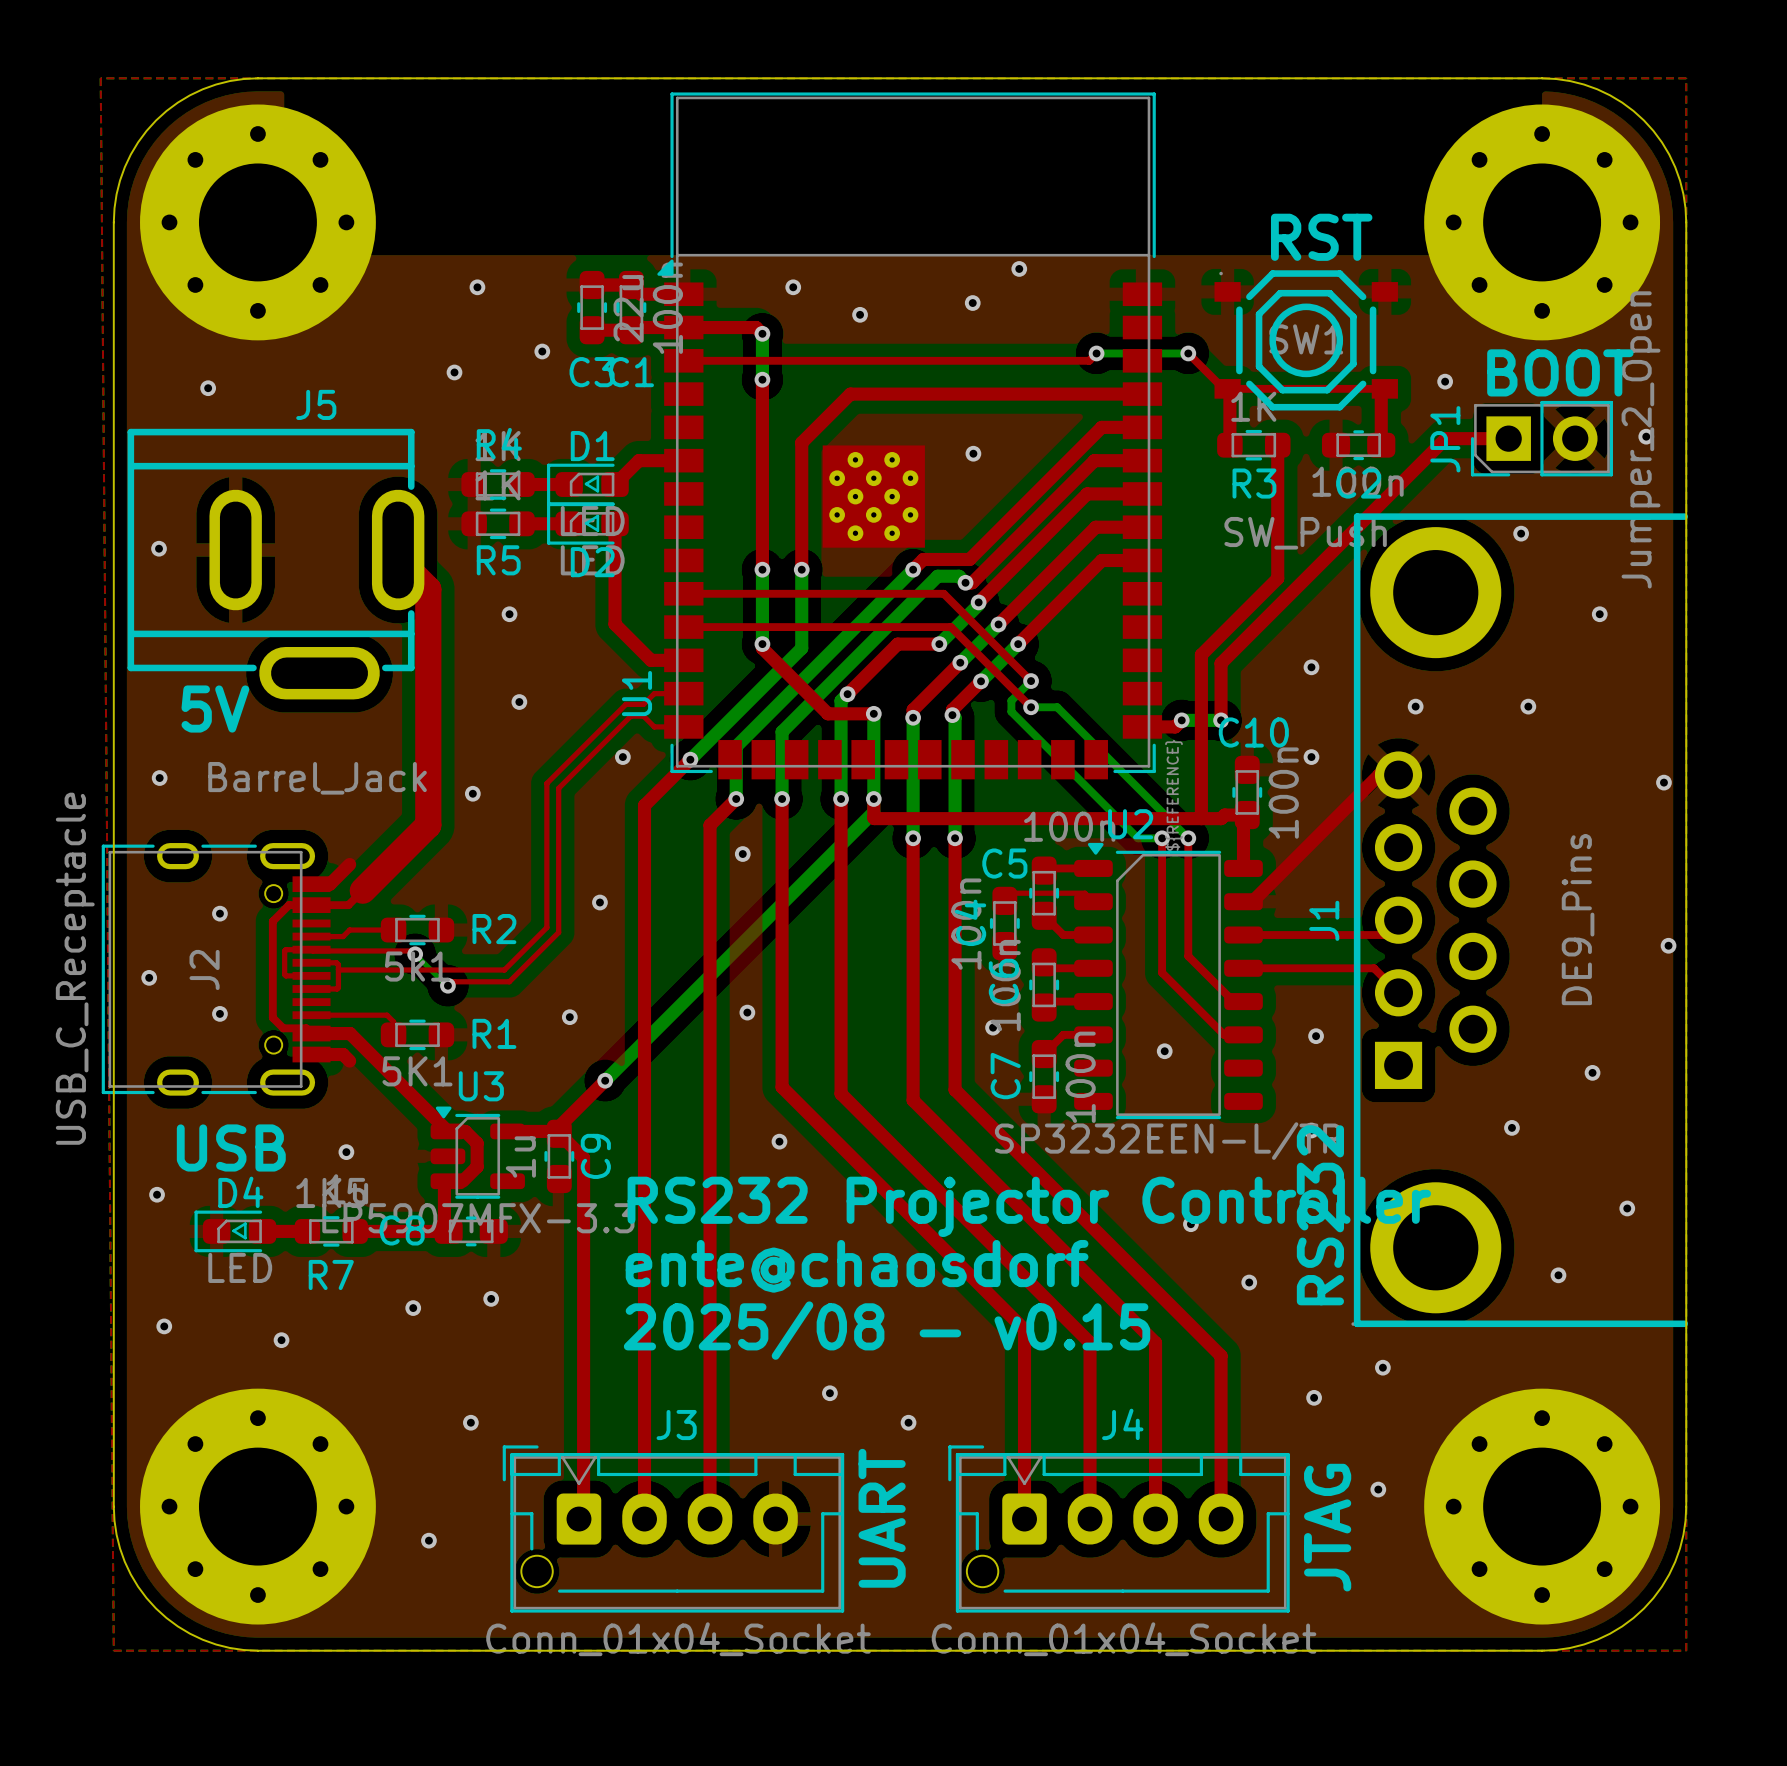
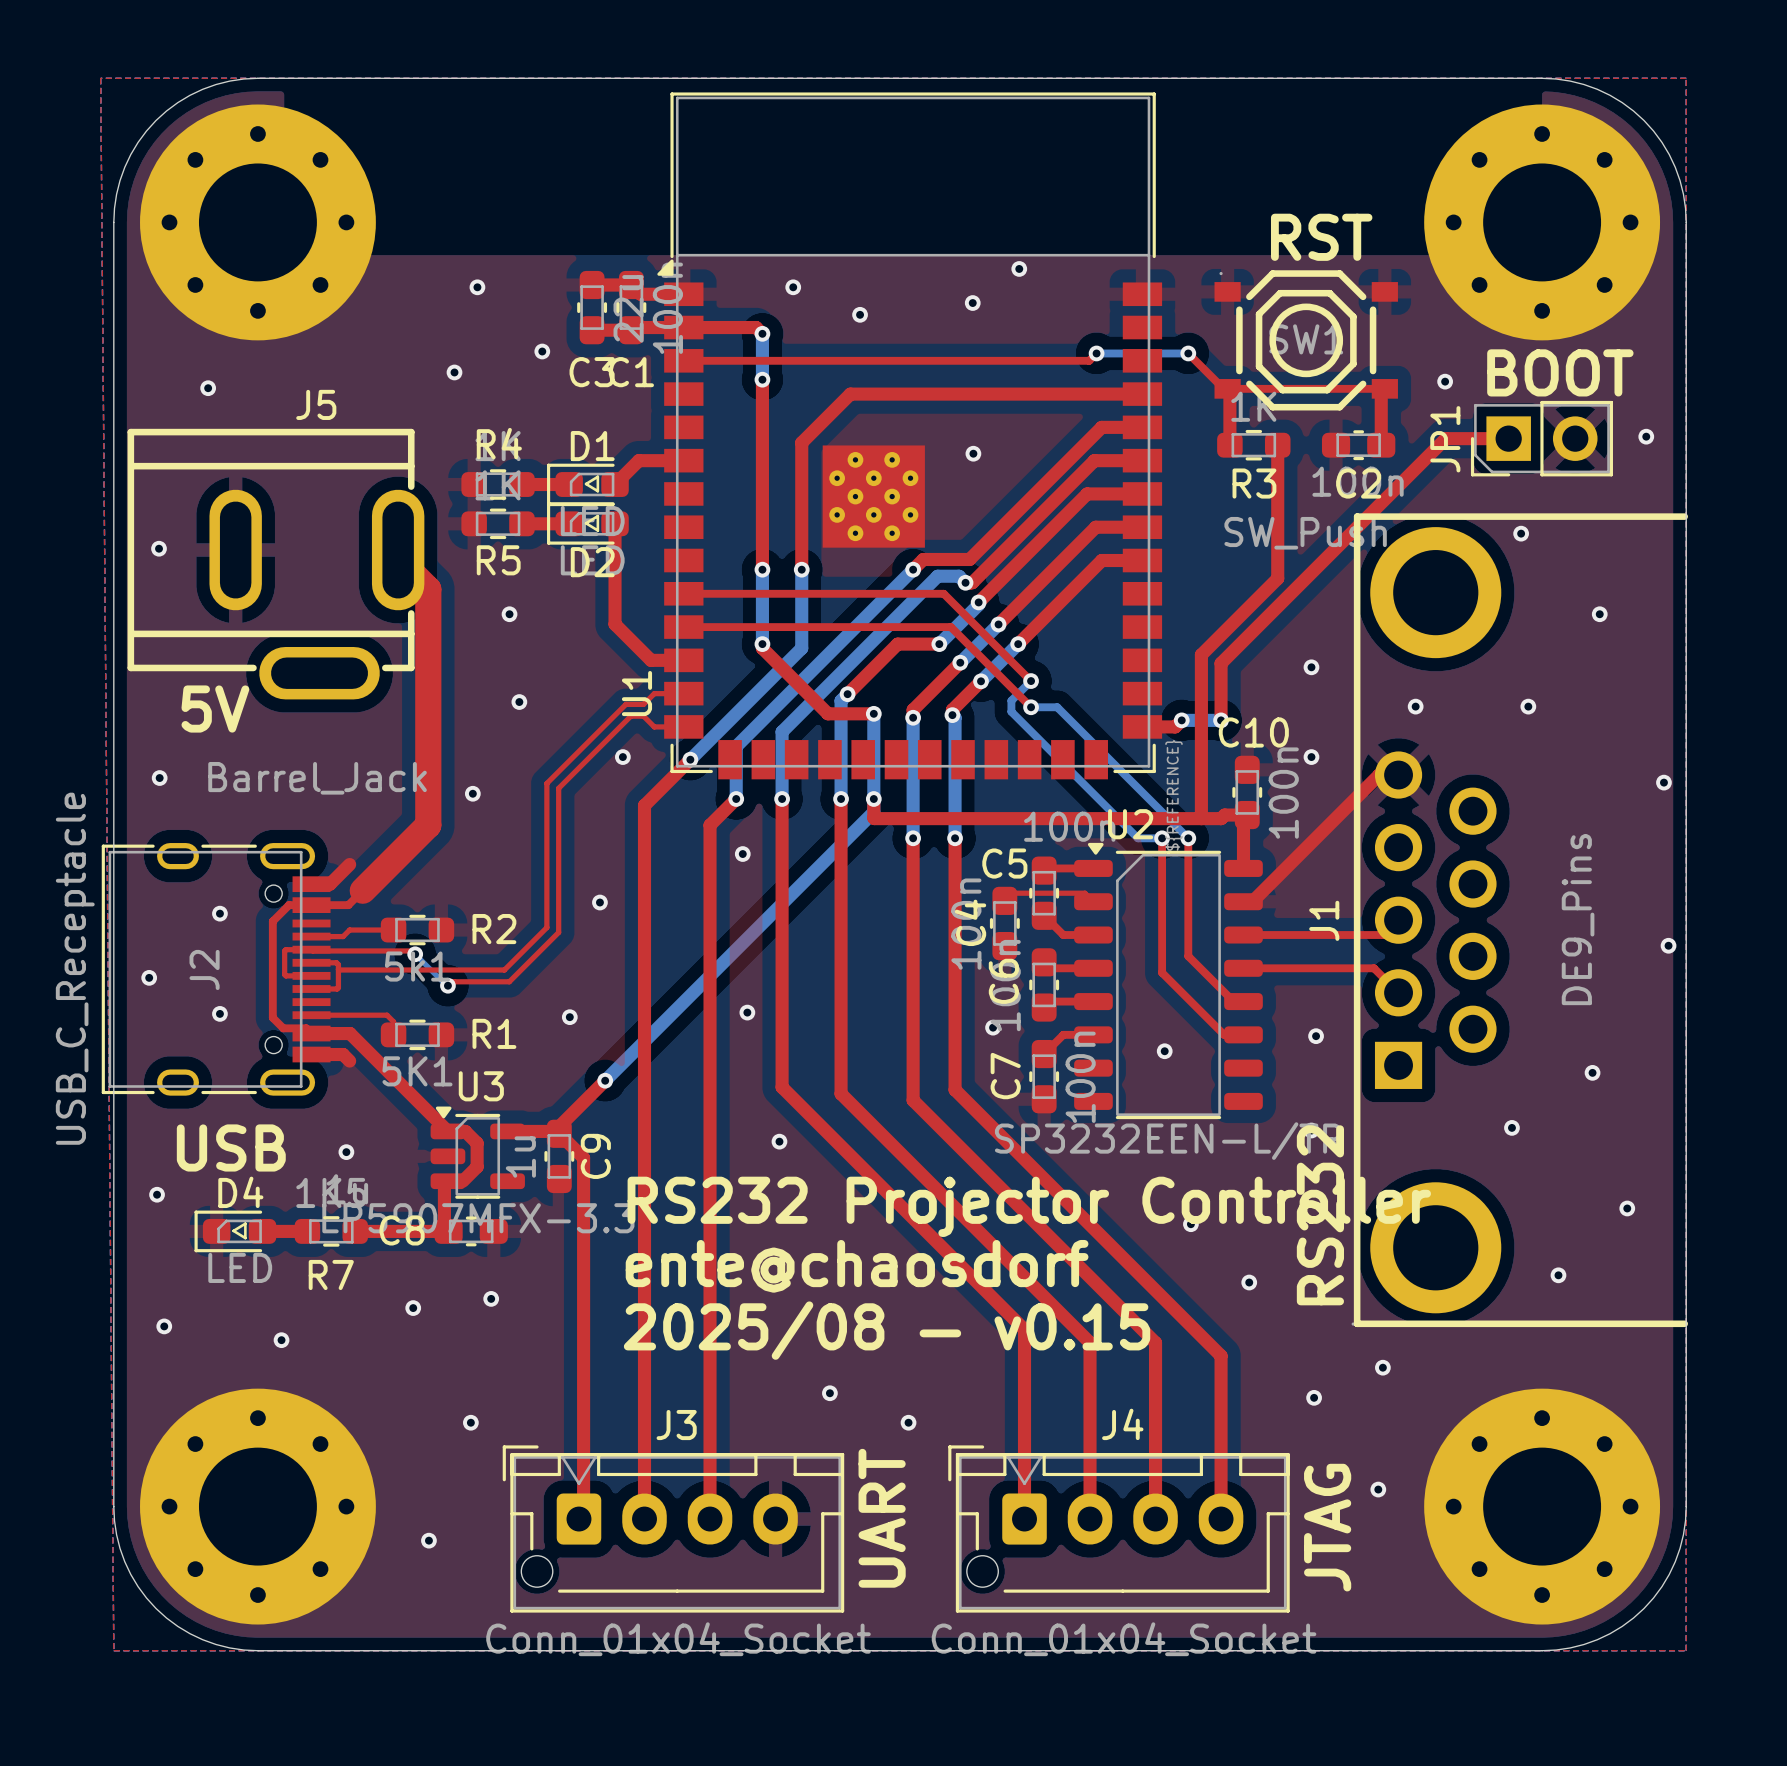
JP1 value: Jumper_2_Open (1641, 439) -> none

